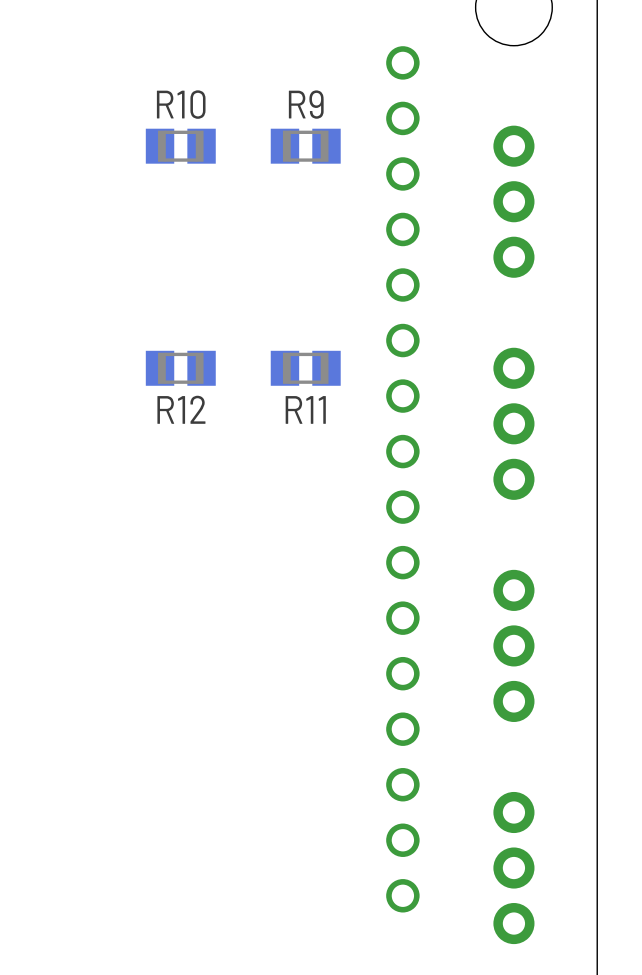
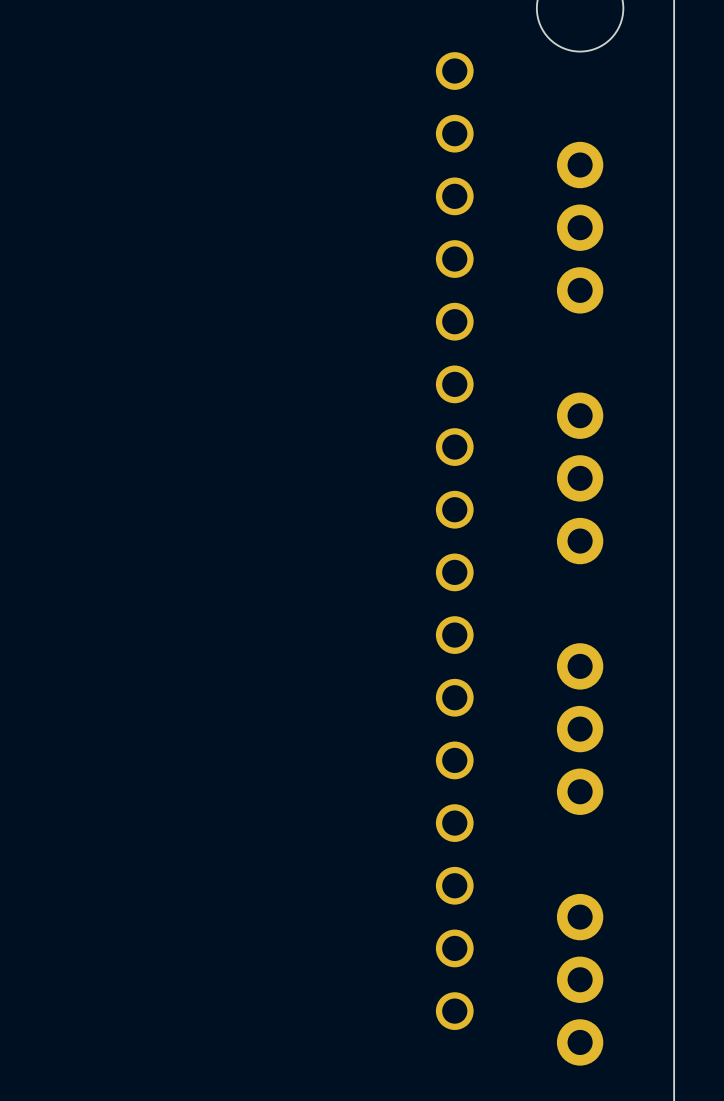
R10: (180, 146) -> none
R9: (305, 146) -> none
R12: (180, 368) -> none
R11: (305, 368) -> none

